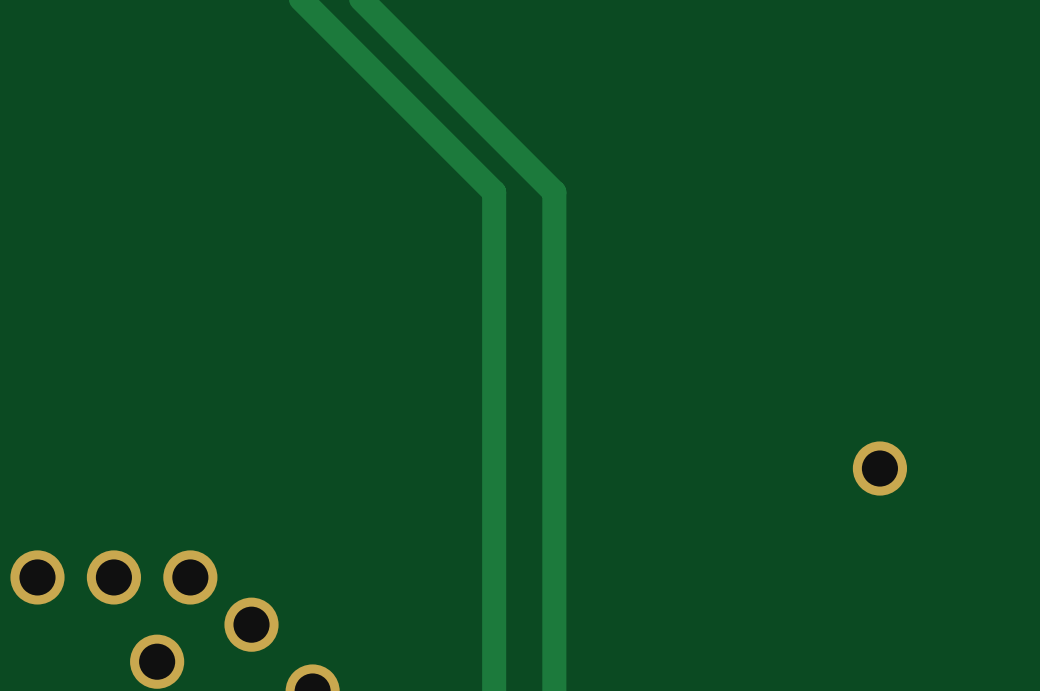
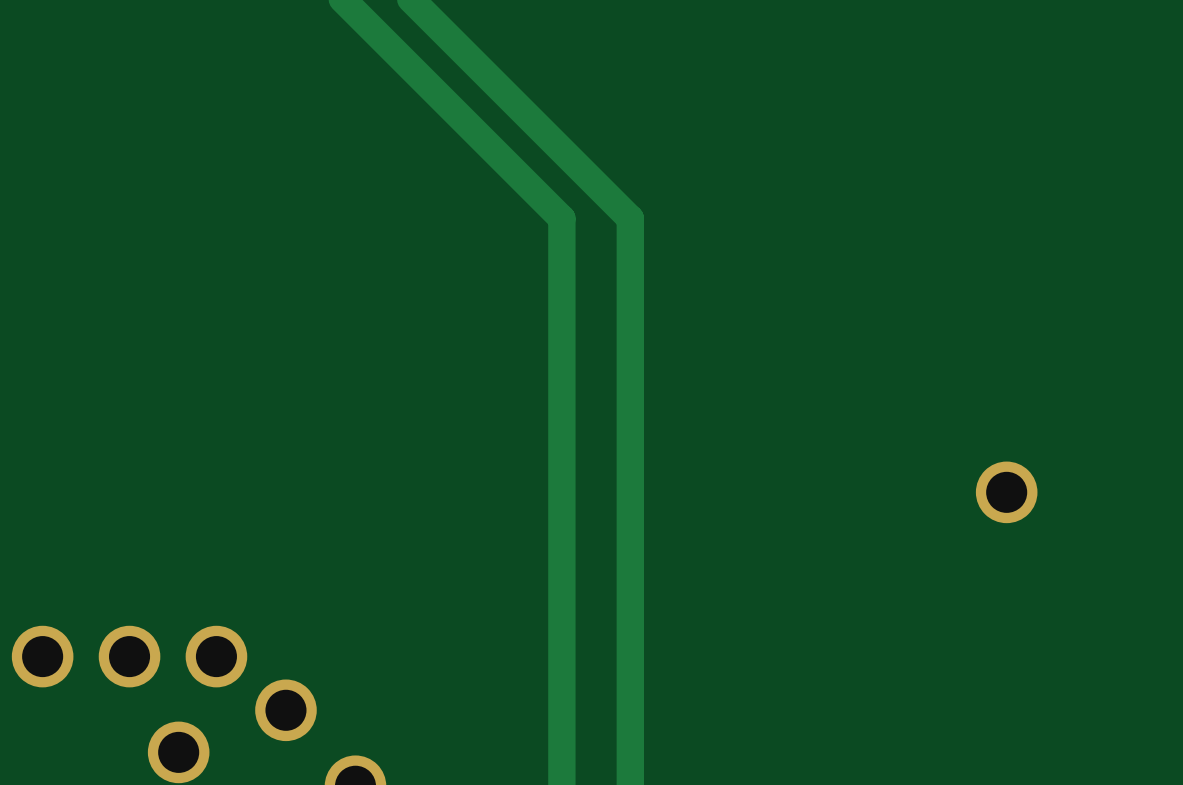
via position: (879, 468) -> (1006, 492)

